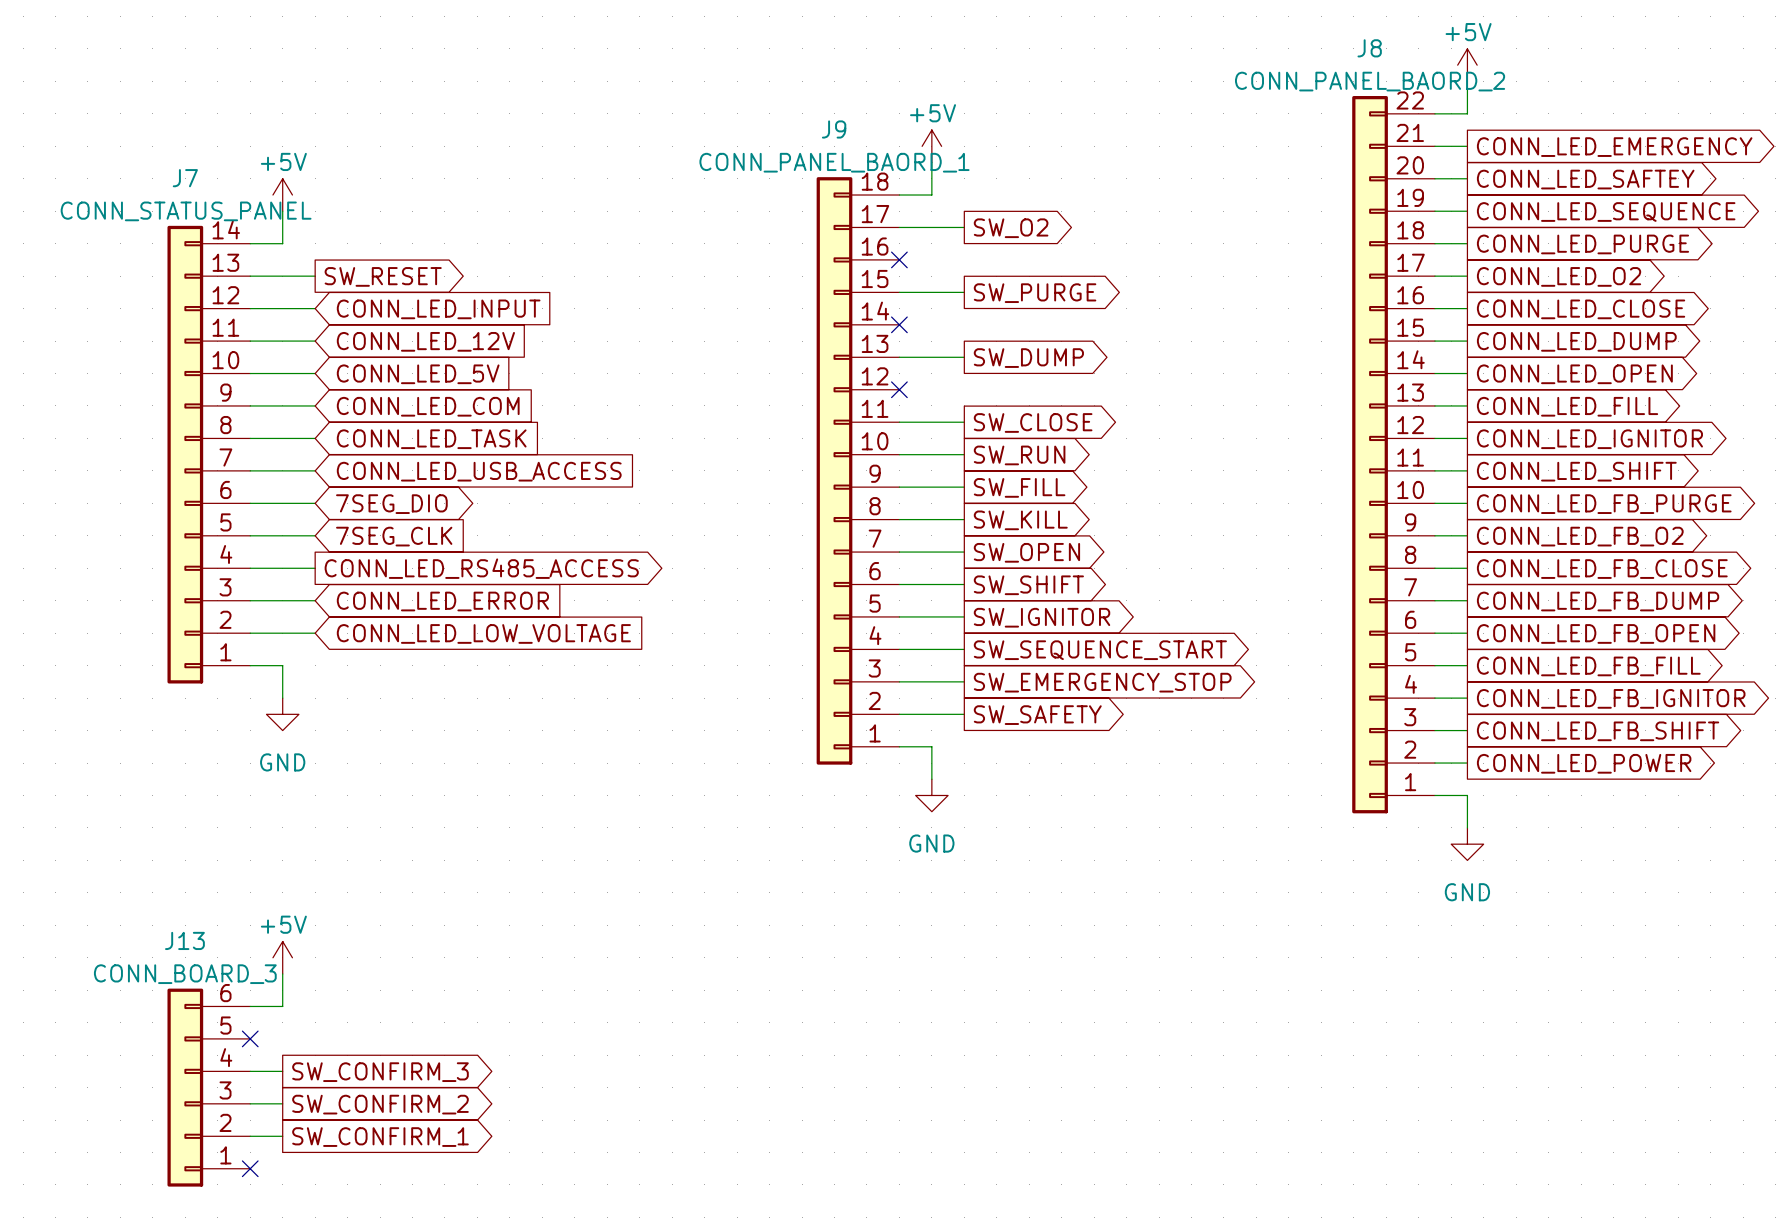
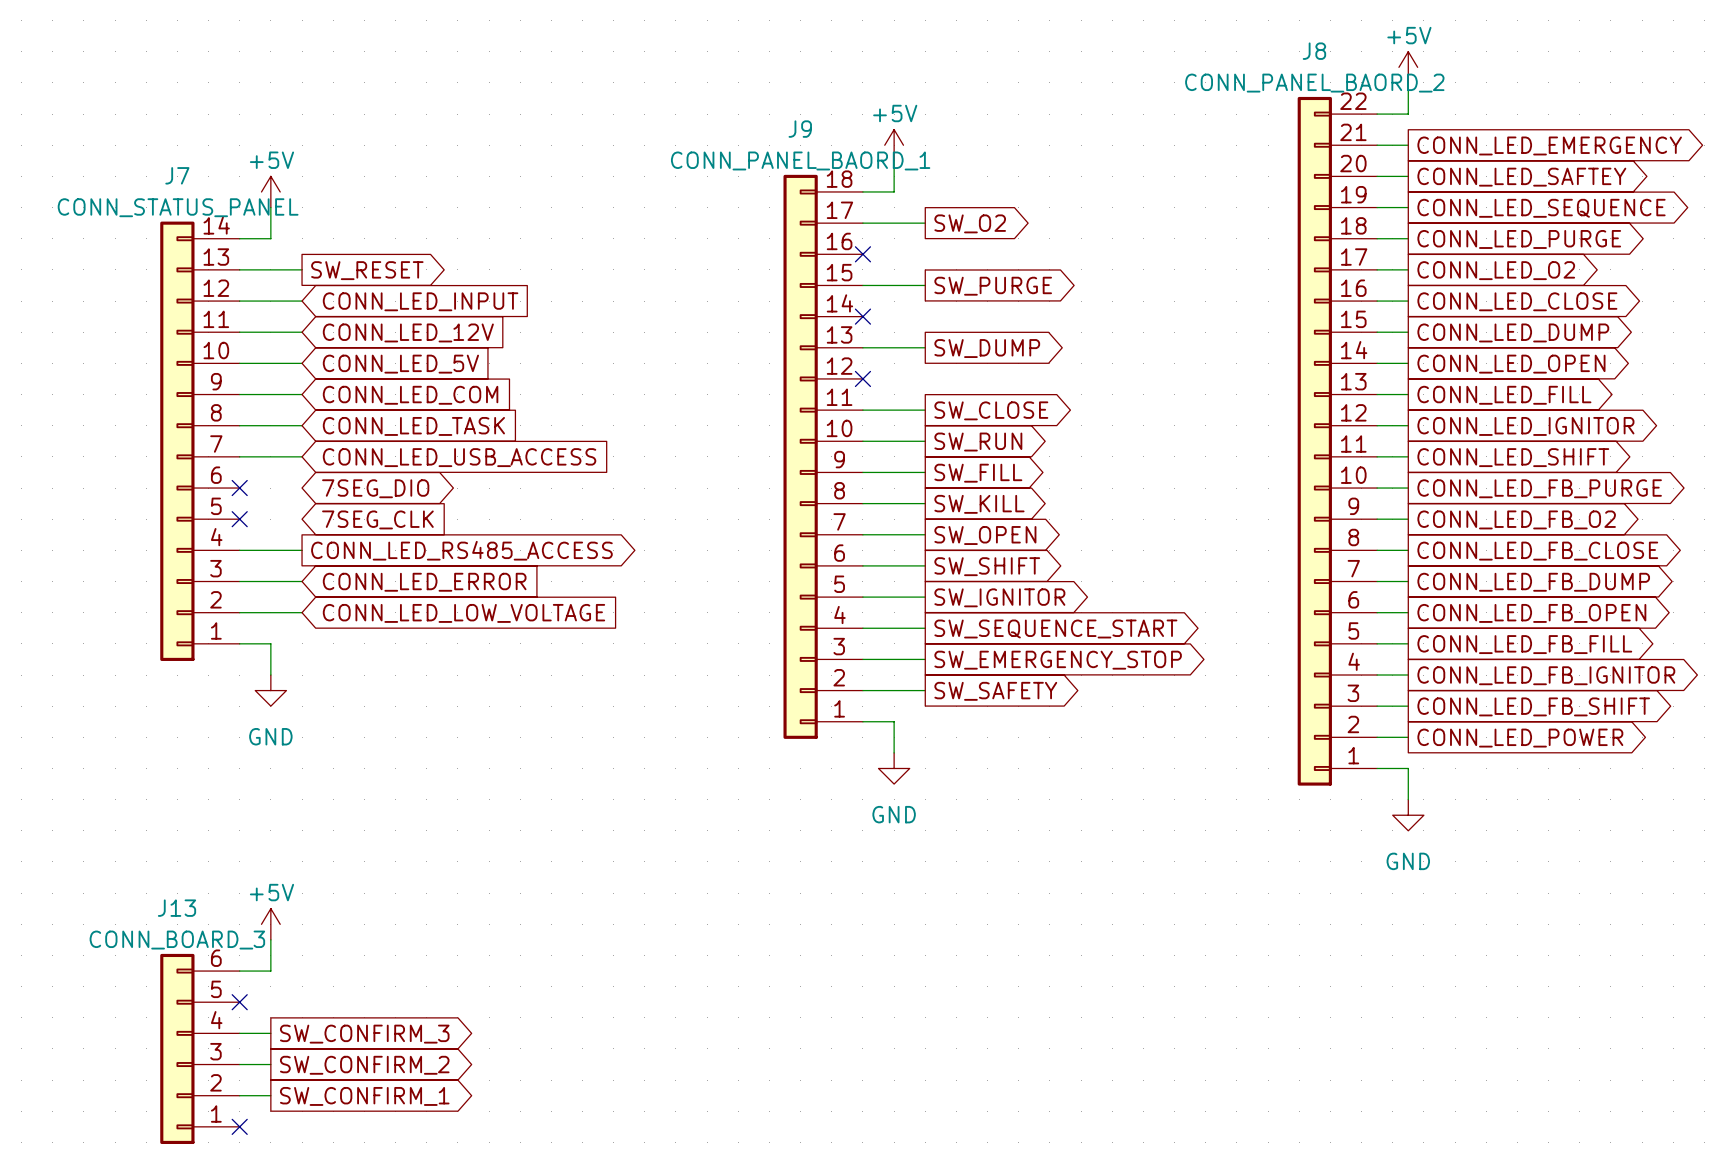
wire: (250, 503) (315, 503) -> none
no-connect mark: none -> (239, 488)
wire: (250, 535) (315, 535) -> none
no-connect mark: none -> (239, 519)

